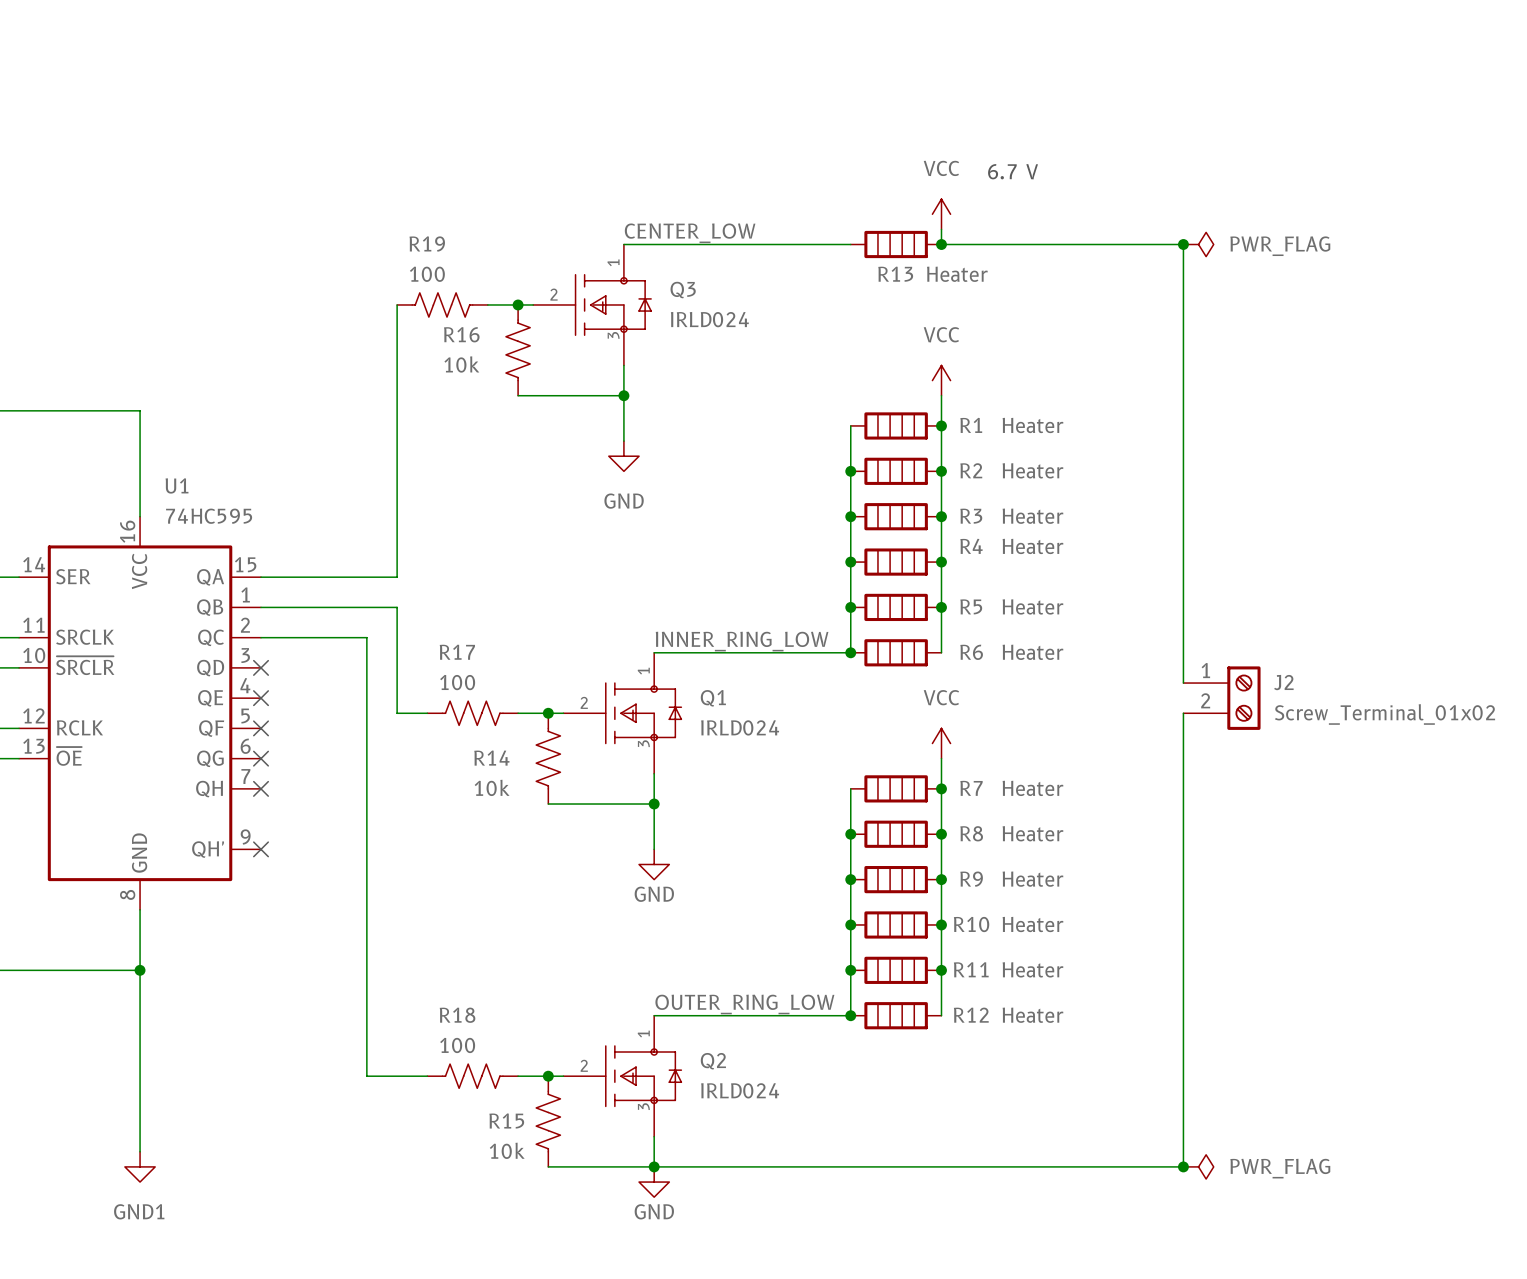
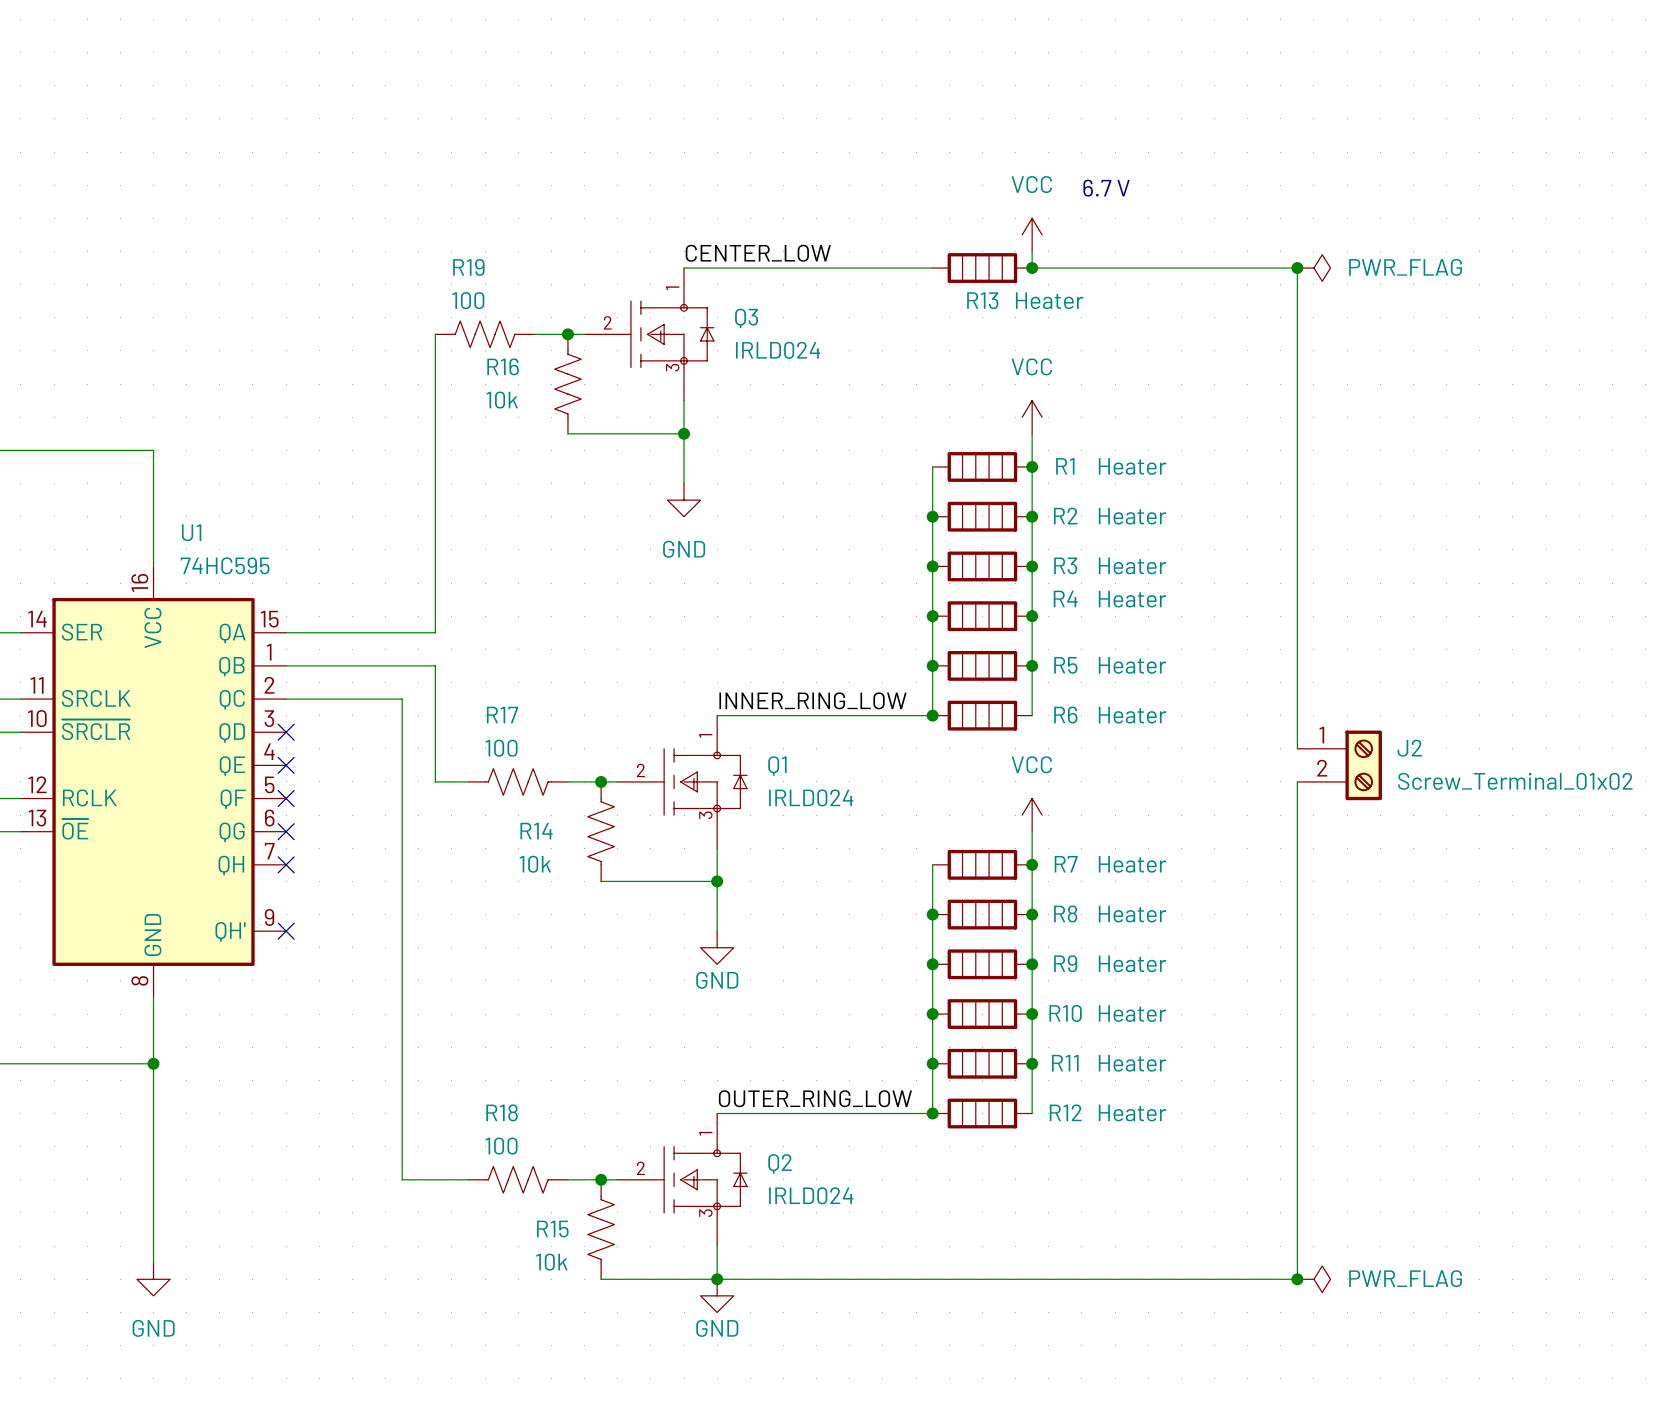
power symbol: GND1 (140, 1166) -> GND (153, 1279)

